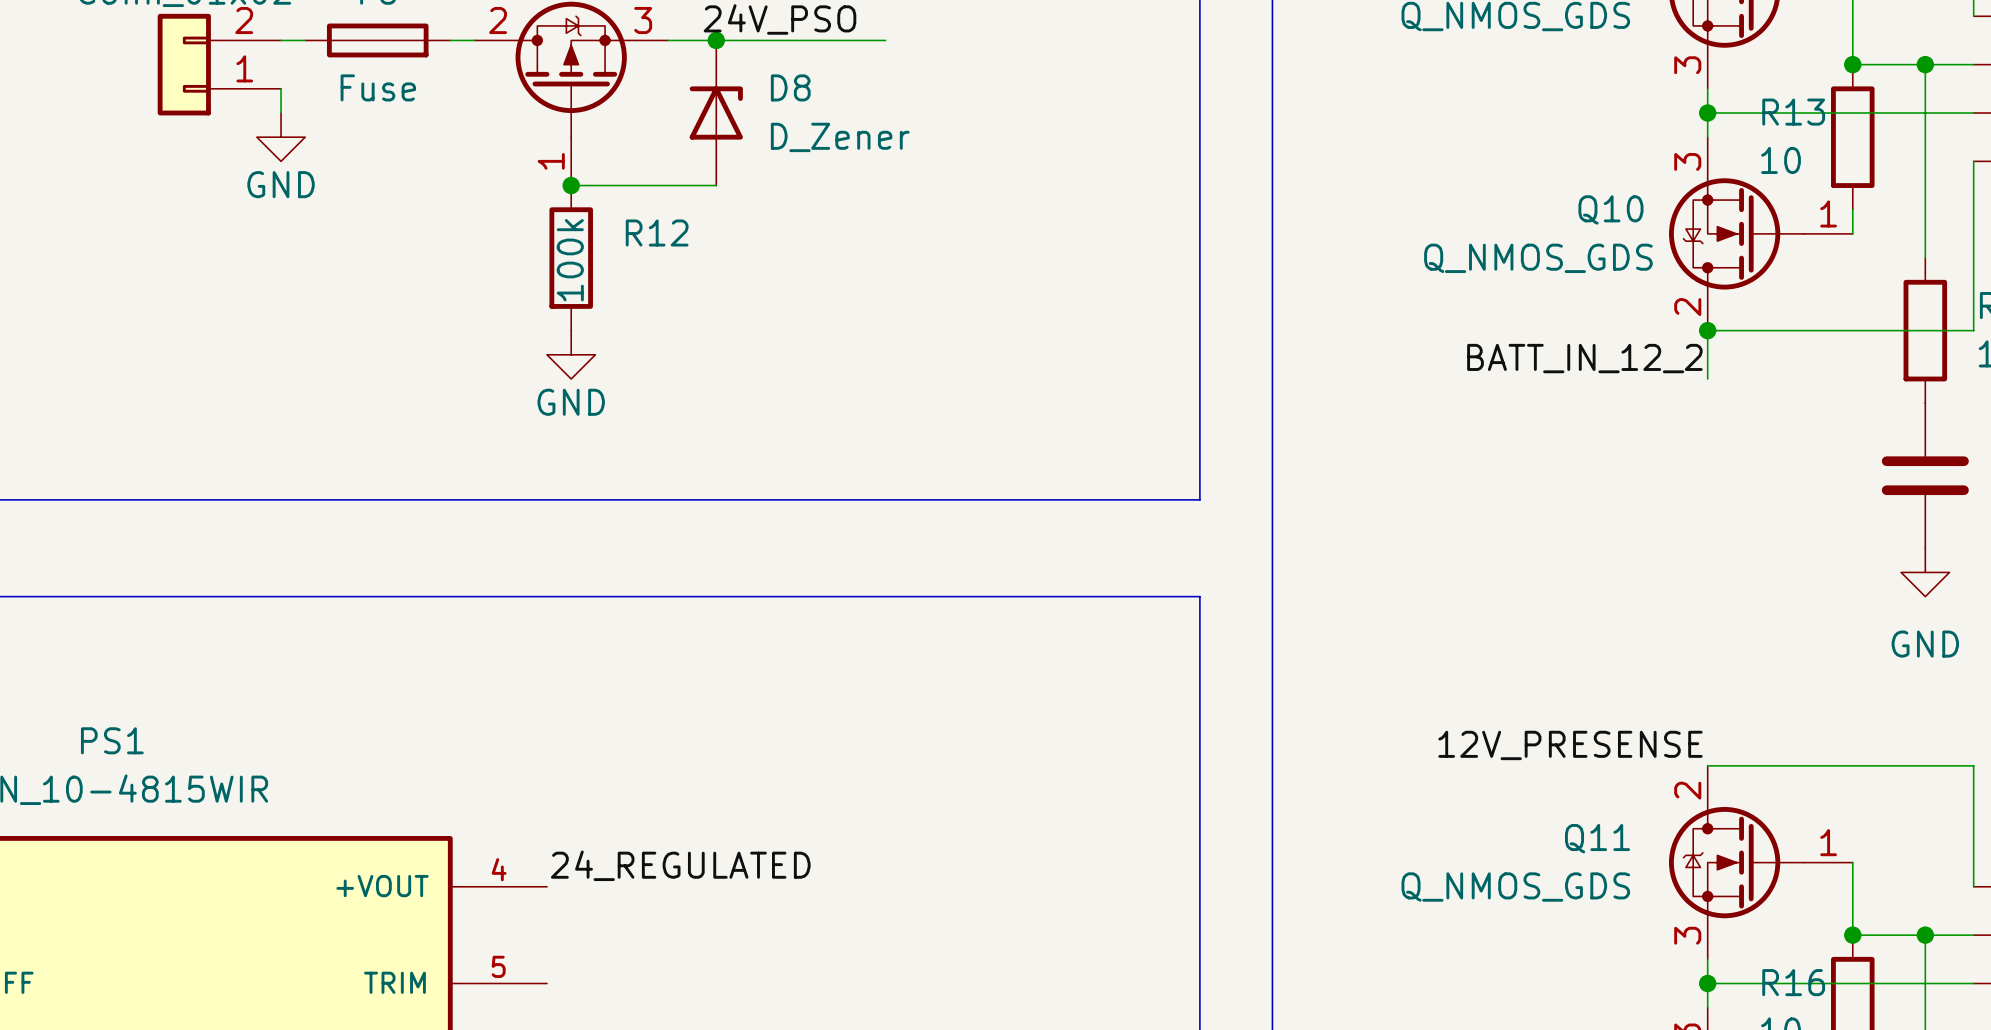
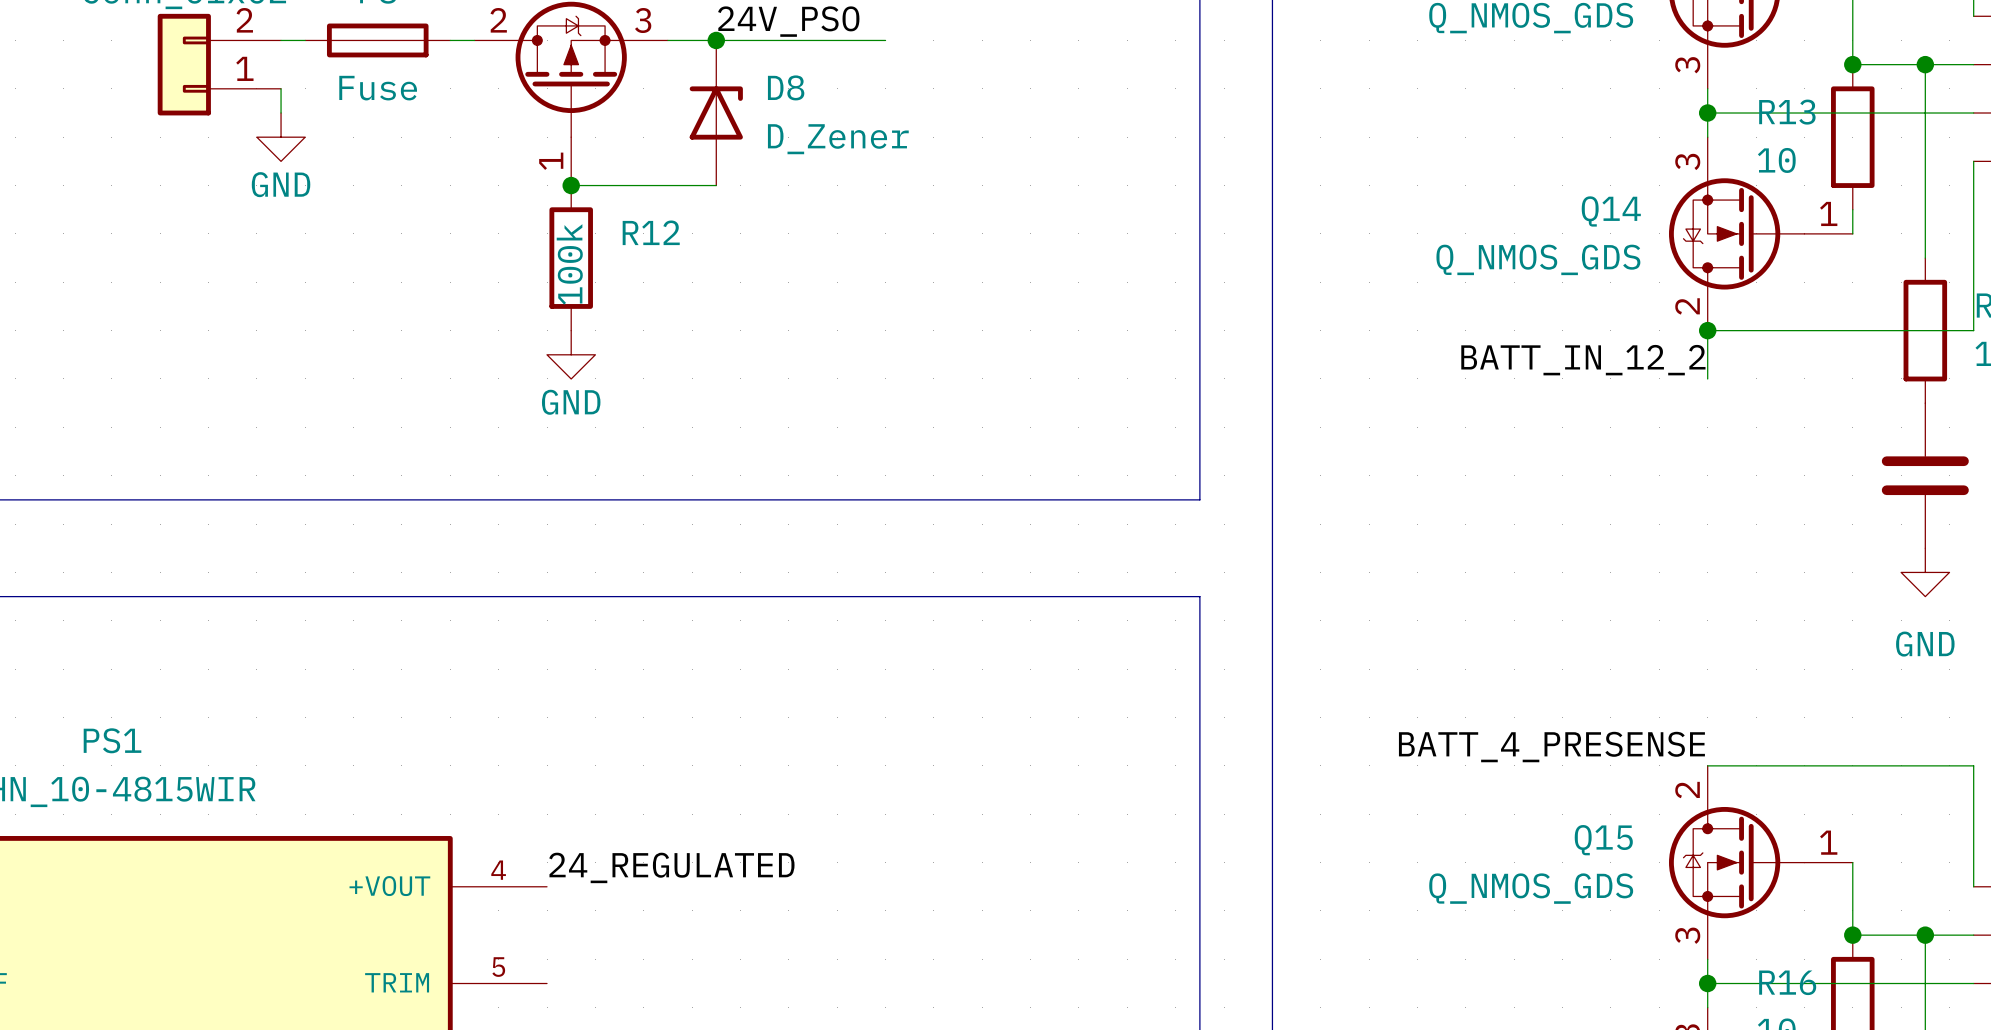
Q10 name: Q10 (1610, 209) -> Q14 (1611, 211)
label: 12V_PRESENSE (1570, 745) -> BATT_4_PRESENSE (1551, 747)
Q11 name: Q11 (1597, 838) -> Q15 (1603, 840)

